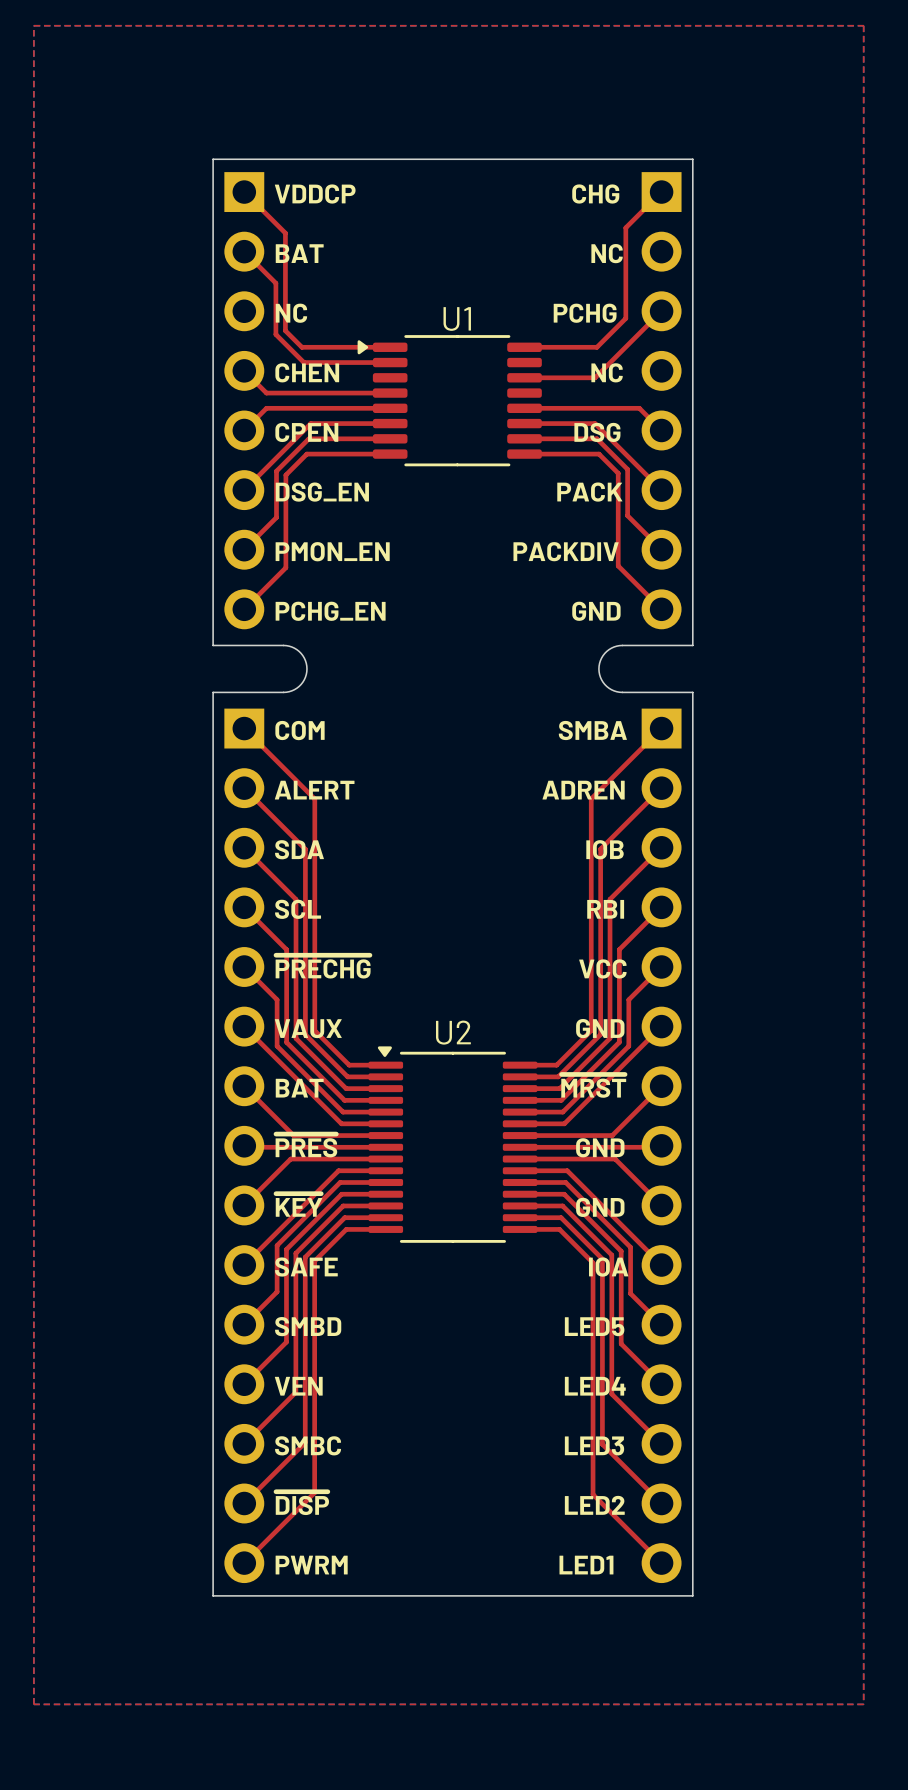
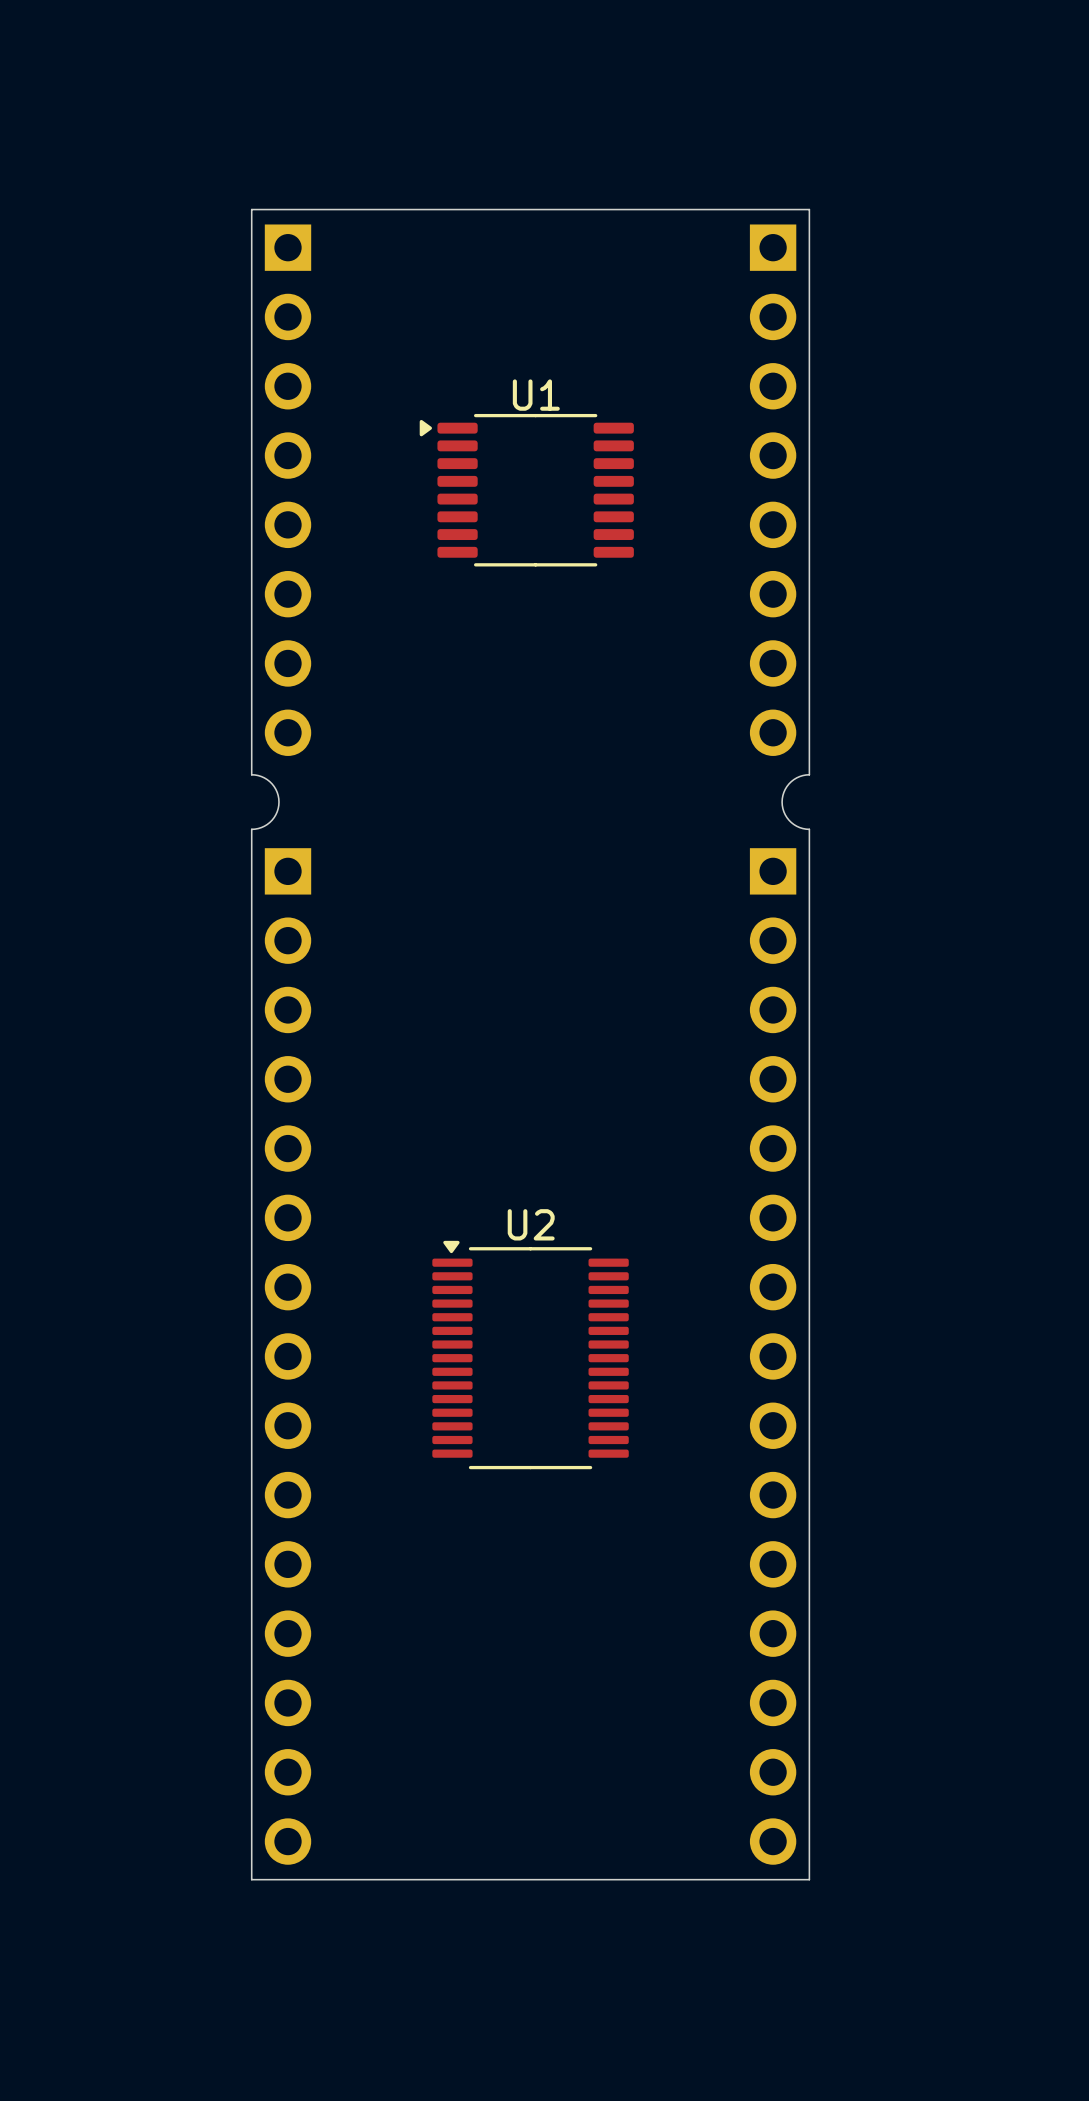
top zone outline: (33, 25) (863, 25) (863, 1704) (33, 1704) (33, 25) -> none
top track: (244, 192) (285, 233) (285, 330) (301, 347) (390, 347) -> none
top track: (661, 192) (625, 227) (625, 318) (596, 347) (524, 347) -> none
text: VDDCP (315, 194) -> none
text: CHG (595, 194) -> none
top track: (244, 251) (275, 283) (275, 334) (303, 362) (390, 362) -> none
text: BAT (299, 253) -> none
text: NC (607, 253) -> none
top track: (661, 311) (595, 377) (524, 377) -> none
text: NC (291, 313) -> none
text: PCHG (585, 313) -> none
top track: (244, 370) (266, 393) (390, 393) -> none
text: CHEN (307, 372) -> none
text: NC (607, 372) -> none
top track: (390, 408) (266, 408) (244, 430) -> none
top track: (524, 408) (639, 408) (661, 430) -> none
top track: (390, 423) (310, 423) (244, 490) -> none
top track: (524, 423) (595, 423) (661, 490) -> none
text: CPEN (306, 432) -> none
text: DSG (597, 432) -> none
top track: (390, 438) (308, 438) (276, 471) (276, 517) (244, 549) -> none
top track: (524, 438) (597, 438) (627, 469) (627, 515) (661, 549) -> none
top track: (390, 454) (306, 454) (285, 475) (285, 567) (244, 609) -> none
top track: (524, 454) (599, 454) (618, 473) (618, 565) (661, 609) -> none
text: DSG_EN (322, 492) -> none
text: PACK (589, 492) -> none
text: PMON_EN (332, 551) -> none
text: PACKDIV (566, 551) -> none
text: PCHG_EN (330, 611) -> none
text: GND (596, 611) -> none
board edge: (213, 645) (289, 646) (301, 653) (305, 660) (306, 668) (305, 677) (301, 684) (289, 691) (213, 692) -> (251, 774) (261, 776) (269, 781) (277, 792) (278, 802) (277, 811) (269, 822) (261, 827) (251, 829)
board edge: (692, 645) (616, 646) (609, 649) (603, 655) (598, 668) (603, 682) (609, 688) (616, 691) (692, 692) -> (809, 774) (799, 776) (791, 781) (785, 789) (782, 802) (785, 814) (791, 822) (799, 827) (809, 829)
top track: (244, 728) (314, 799) (314, 1030) (349, 1065) (385, 1065) -> none
top track: (661, 728) (591, 798) (591, 1030) (556, 1065) (520, 1065) -> none
text: COM (300, 730) -> none
text: SMBA (592, 730) -> none
top track: (244, 788) (305, 849) (305, 1034) (347, 1076) (385, 1076) -> none
top track: (661, 788) (600, 849) (600, 1034) (558, 1076) (520, 1076) -> none
text: ALERT (314, 790) -> none
text: ADREN (583, 790) -> none
top track: (244, 847) (296, 899) (296, 1038) (346, 1088) (385, 1088) -> none
top track: (661, 847) (610, 899) (610, 1038) (559, 1088) (520, 1088) -> none
text: SDA (299, 849) -> none
text: IOB (605, 849) -> none
top track: (244, 907) (286, 949) (286, 1042) (344, 1100) (385, 1100) -> none
top track: (661, 907) (619, 949) (619, 1042) (561, 1100) (520, 1100) -> none
text: SCL (298, 909) -> none
text: RBI (605, 909) -> none
top track: (244, 966) (277, 999) (277, 1046) (343, 1112) (385, 1112) -> none
text: ~{PRECHG} (323, 966) -> none
top track: (661, 966) (628, 999) (628, 1046) (562, 1112) (520, 1112) -> none
text: VCC (602, 968) -> none
top track: (244, 1026) (341, 1123) (385, 1123) -> none
top track: (661, 1026) (564, 1123) (520, 1123) -> none
text: VAUX (308, 1028) -> none
text: GND (600, 1028) -> none
top track: (244, 1086) (293, 1135) (385, 1135) -> none
text: ~{MRST} (593, 1086) -> none
top track: (661, 1086) (612, 1135) (520, 1135) -> none
text: BAT (299, 1088) -> none
top track: (244, 1145) (385, 1147) -> none
text: ~{PRES} (306, 1145) -> none
top track: (661, 1145) (520, 1147) -> none
text: GND (600, 1147) -> none
top track: (385, 1159) (290, 1159) (244, 1205) -> none
top track: (520, 1159) (615, 1159) (661, 1205) -> none
top track: (385, 1170) (338, 1170) (244, 1265) -> none
top track: (520, 1170) (567, 1170) (661, 1265) -> none
top track: (385, 1182) (340, 1182) (277, 1245) (277, 1291) (244, 1324) -> none
top track: (520, 1182) (565, 1182) (630, 1247) (630, 1293) (661, 1324) -> none
top track: (385, 1194) (341, 1194) (286, 1249) (286, 1342) (244, 1384) -> none
top track: (520, 1194) (564, 1194) (621, 1251) (621, 1343) (661, 1384) -> none
text: ~{KEY} (299, 1205) -> none
top track: (385, 1205) (343, 1205) (295, 1253) (295, 1392) (244, 1443) -> none
top track: (520, 1205) (562, 1205) (611, 1255) (611, 1394) (661, 1443) -> none
text: GND (600, 1207) -> none
top track: (385, 1217) (344, 1217) (305, 1257) (305, 1442) (244, 1503) -> none
top track: (520, 1217) (561, 1217) (602, 1258) (602, 1444) (661, 1503) -> none
top track: (385, 1229) (346, 1229) (314, 1261) (314, 1492) (244, 1563) -> none
top track: (520, 1229) (559, 1229) (593, 1262) (593, 1494) (661, 1563) -> none
text: SAFE (306, 1267) -> none
text: IOA (608, 1267) -> none
text: SMBD (308, 1326) -> none
text: LED5 (594, 1326) -> none
text: VEN (298, 1386) -> none
text: LED4 (595, 1386) -> none
text: SMBC (308, 1445) -> none
text: LED3 (594, 1445) -> none
text: ~{DISP} (302, 1503) -> none
text: LED2 (594, 1505) -> none
text: PWRM (311, 1565) -> none
text: LED1 (586, 1565) -> none

